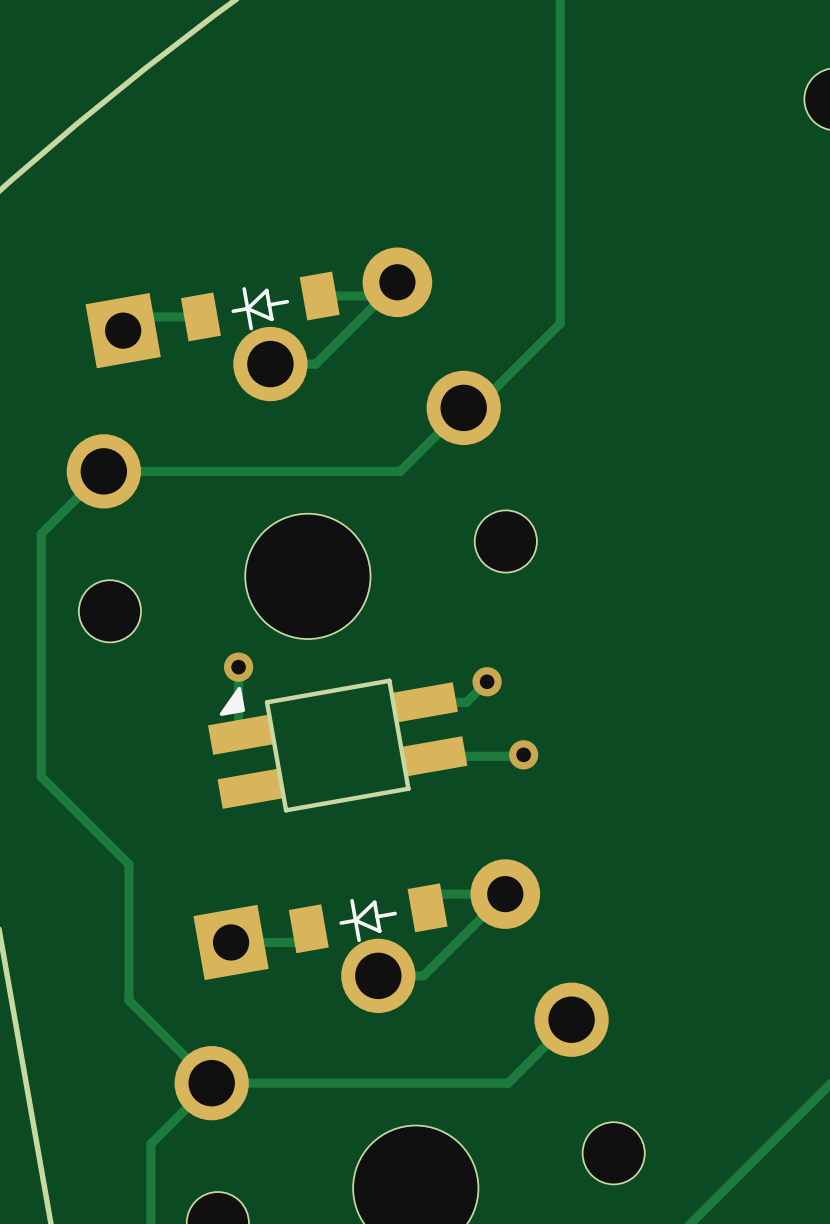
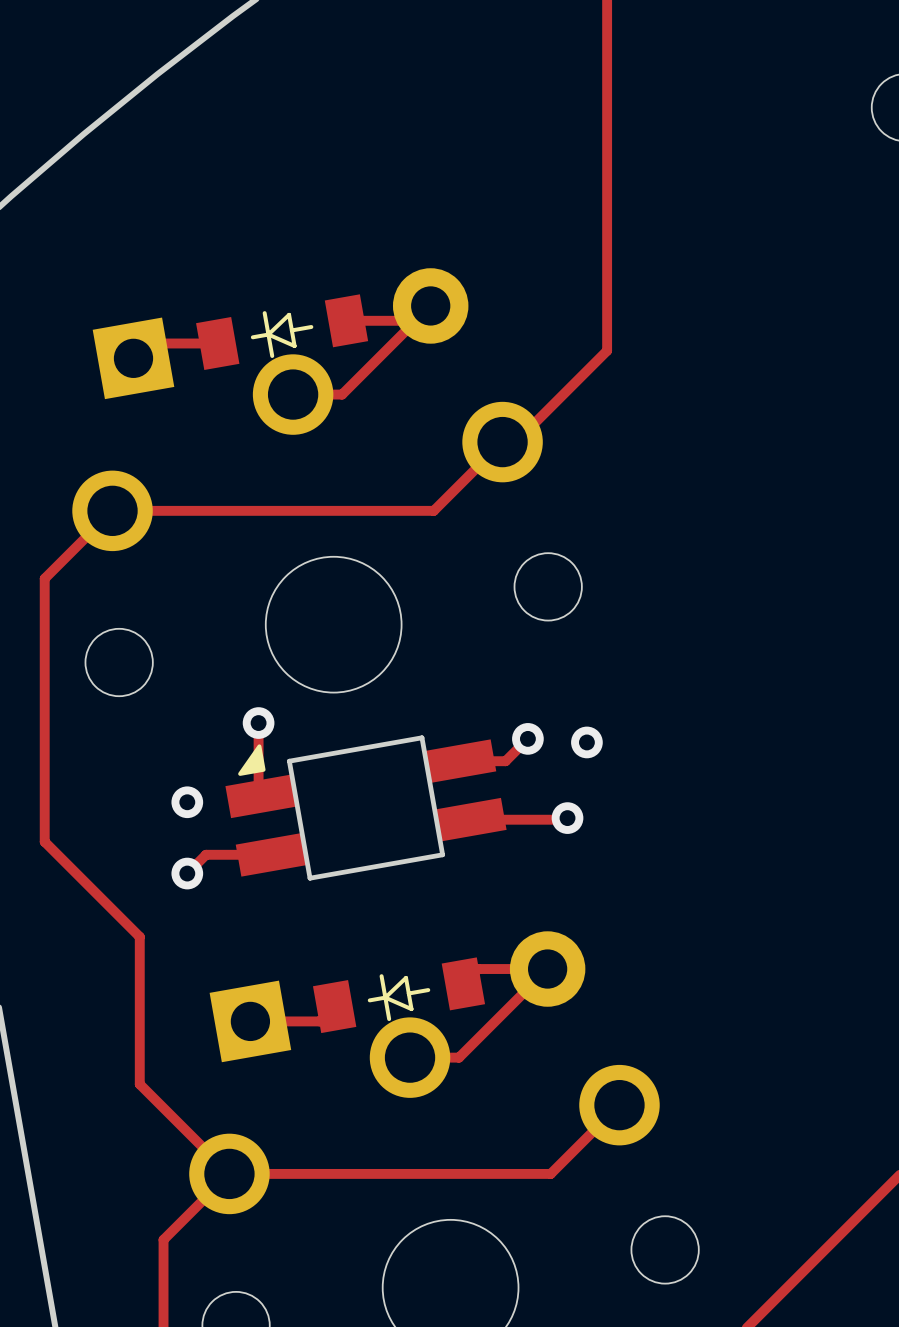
via: none -> (586, 742)
via: none -> (187, 802)
track: none -> (271, 854) (206, 854) (187, 873)
via: none -> (187, 873)

